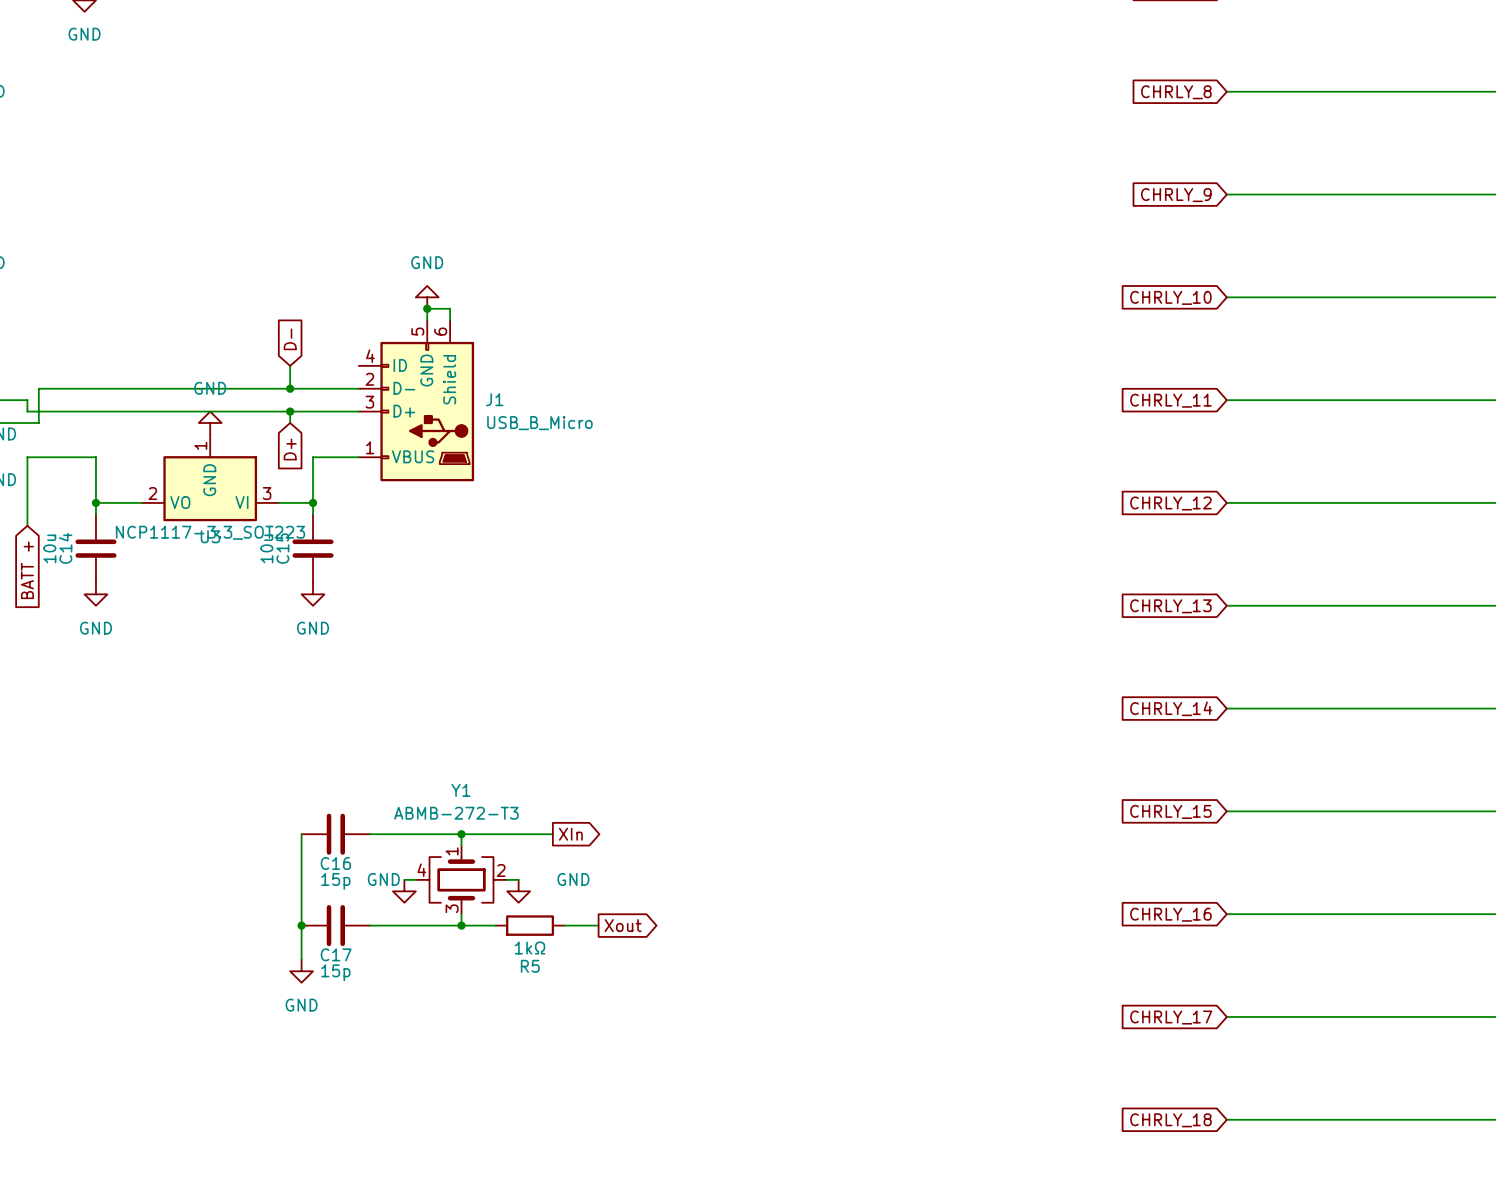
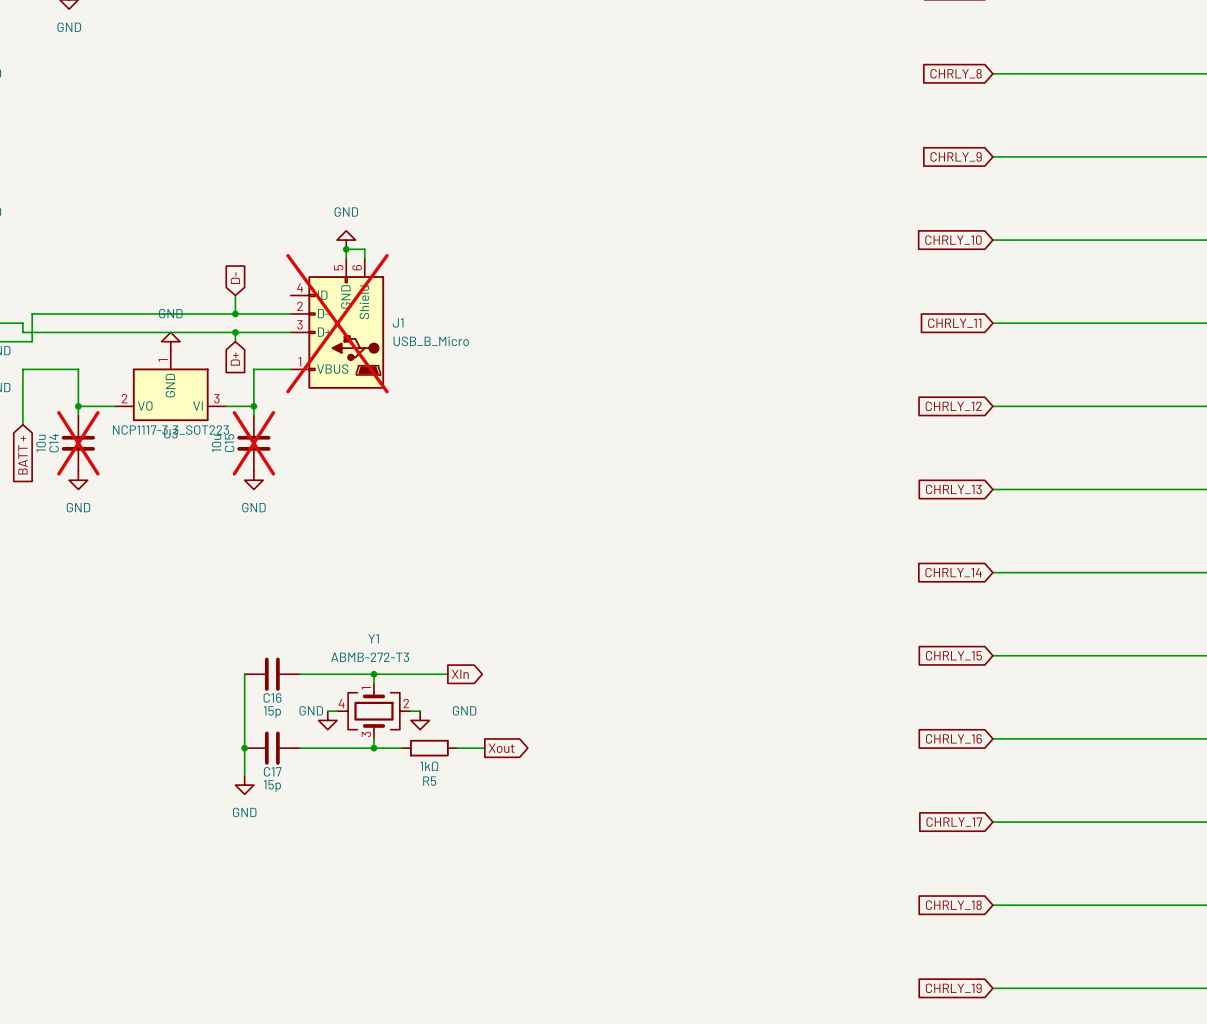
J1 do-not-place cross: none -> (337, 323)
C14 do-not-place cross: none -> (78, 443)
C15 do-not-place cross: none -> (253, 443)

